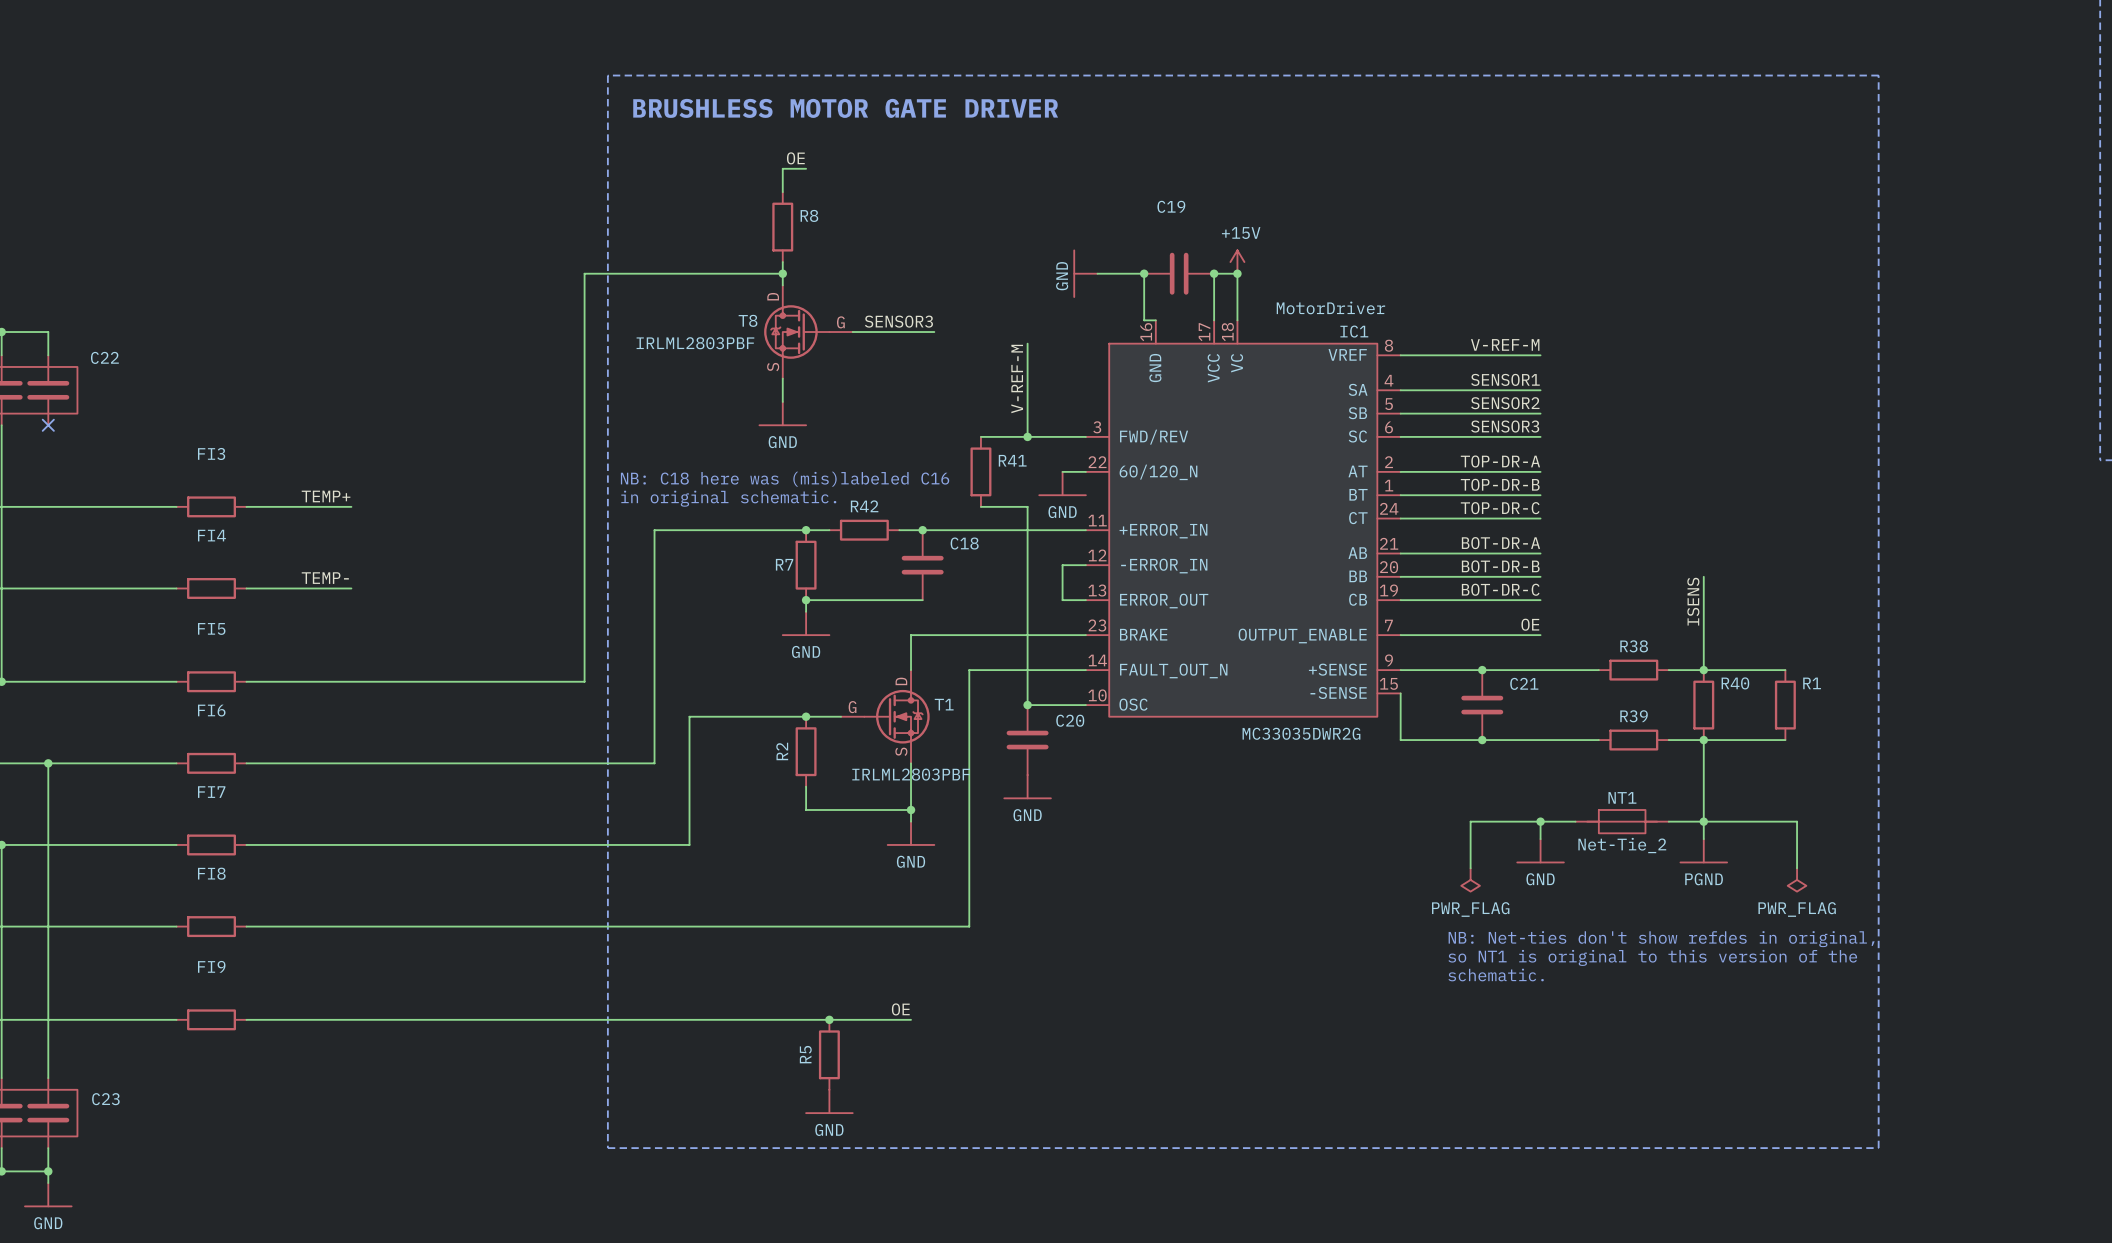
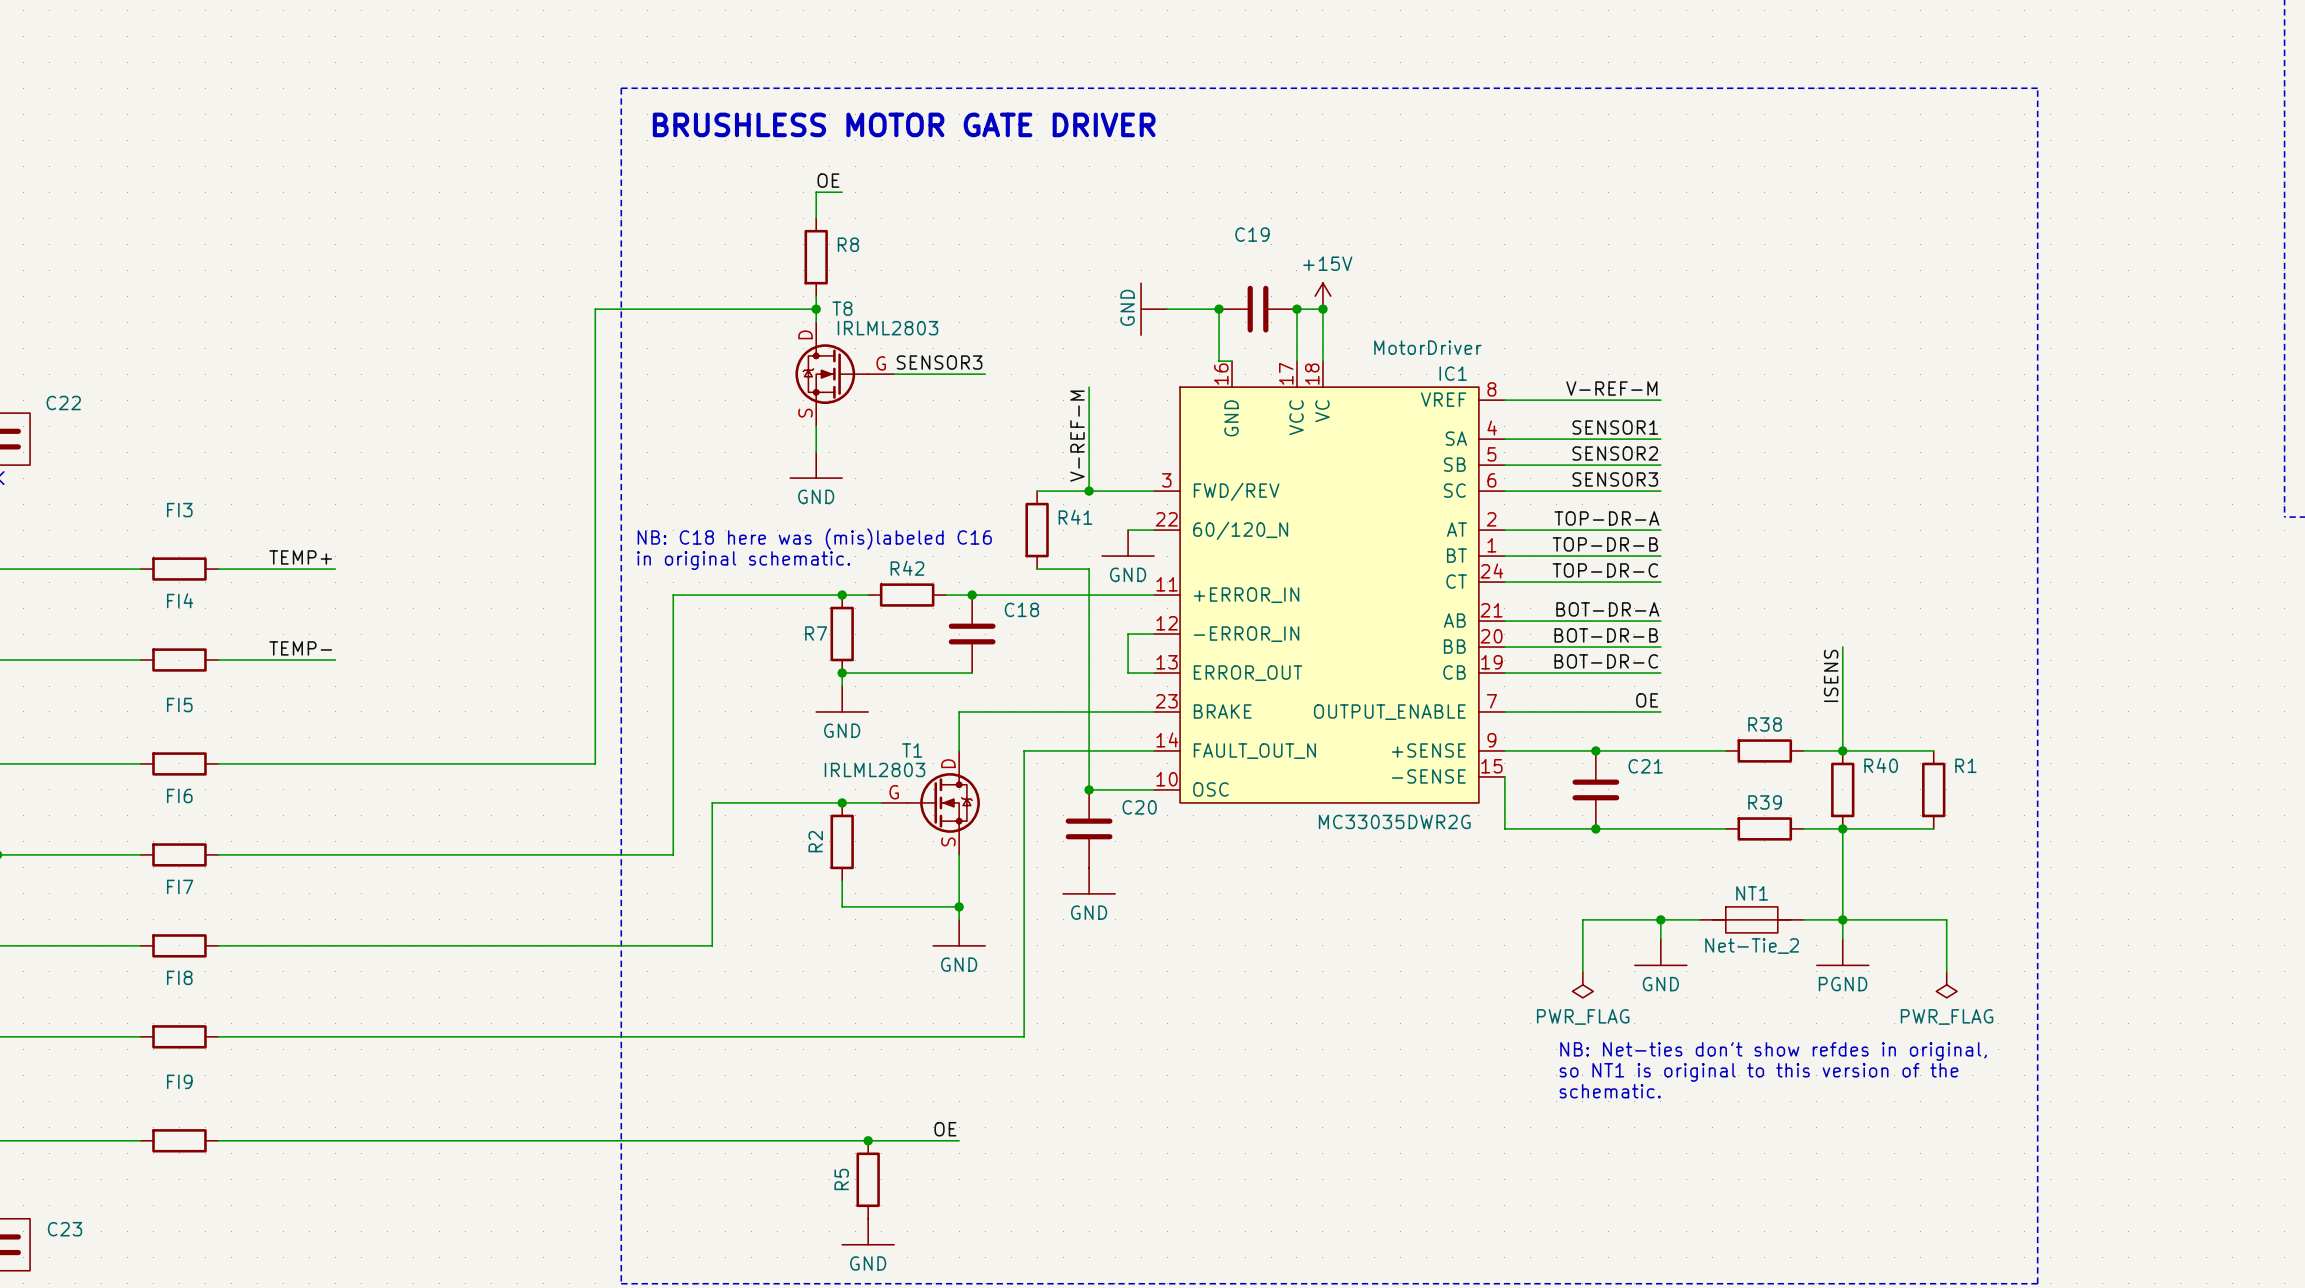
T8 value: none -> IRLML2803 (887, 328)
T8 name position: T8 (748, 320) -> T8 (842, 308)
T8 text: IRLML2803PBF (695, 343) -> none
T1 value: none -> IRLML2803 (874, 769)
T1 name position: T1 (944, 704) -> T1 (912, 750)
T1 text: IRLML2803PBF (911, 774) -> none

